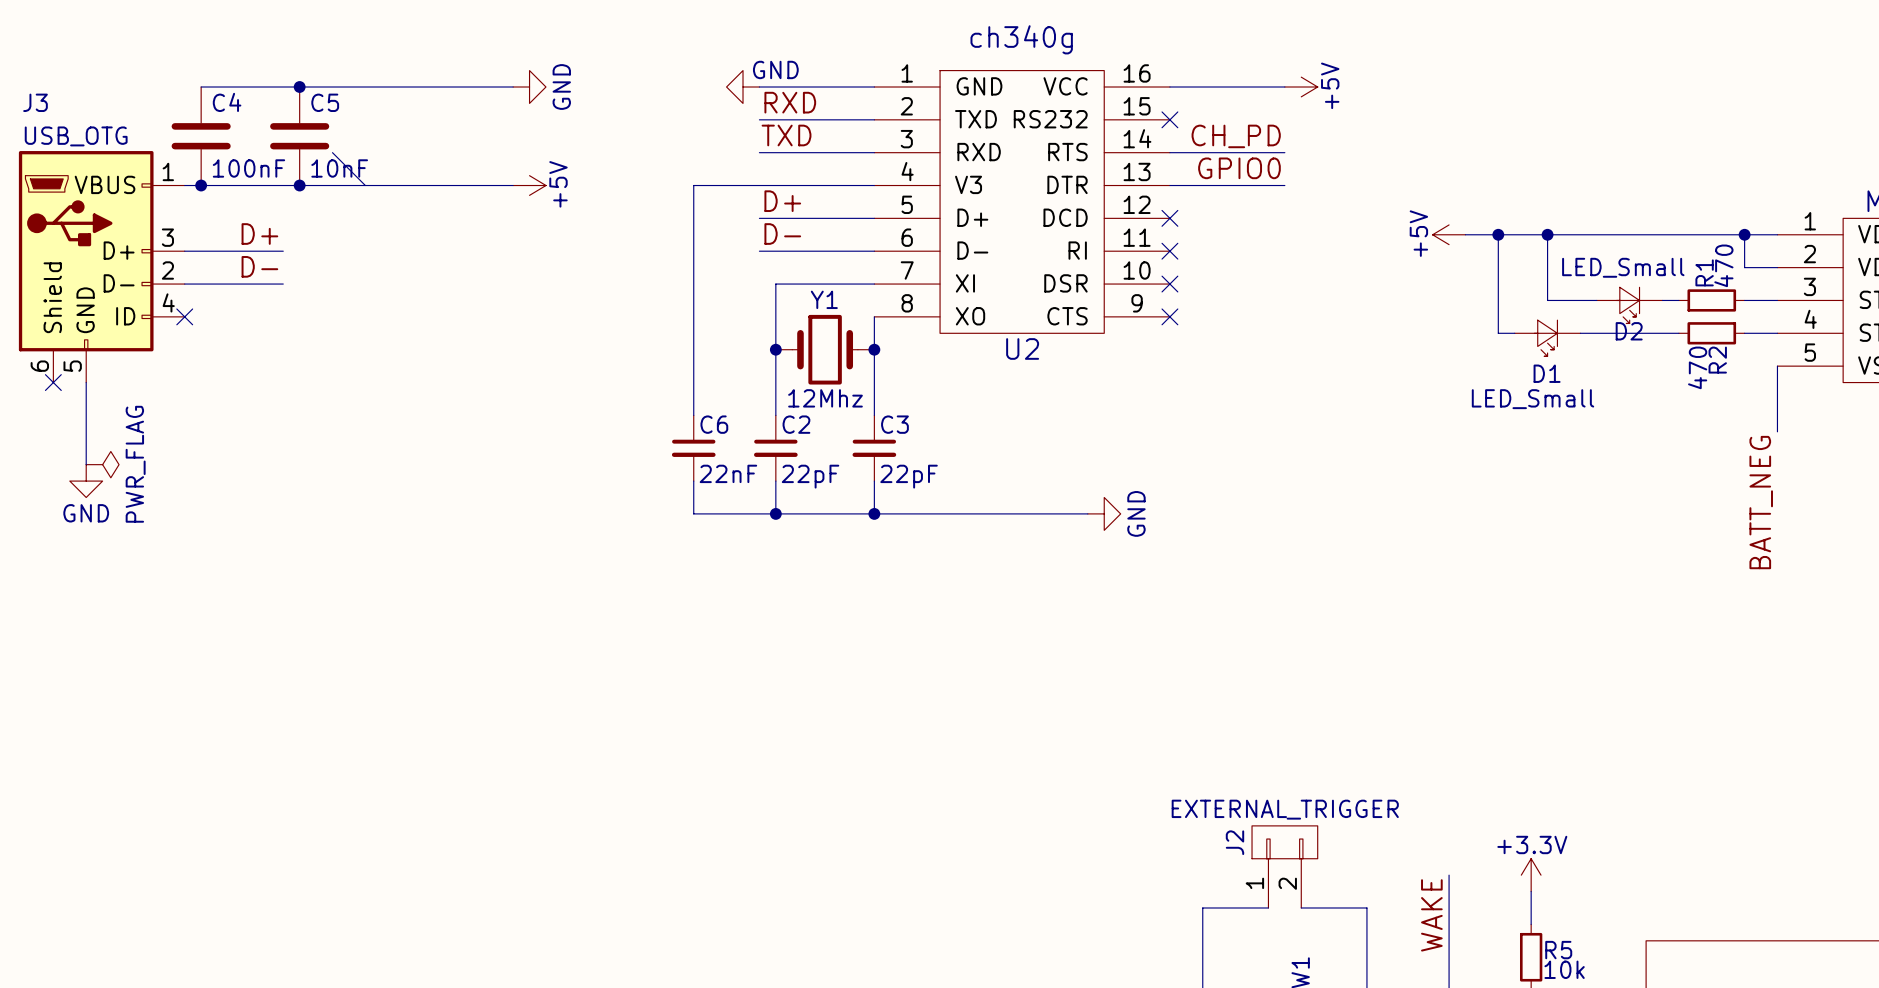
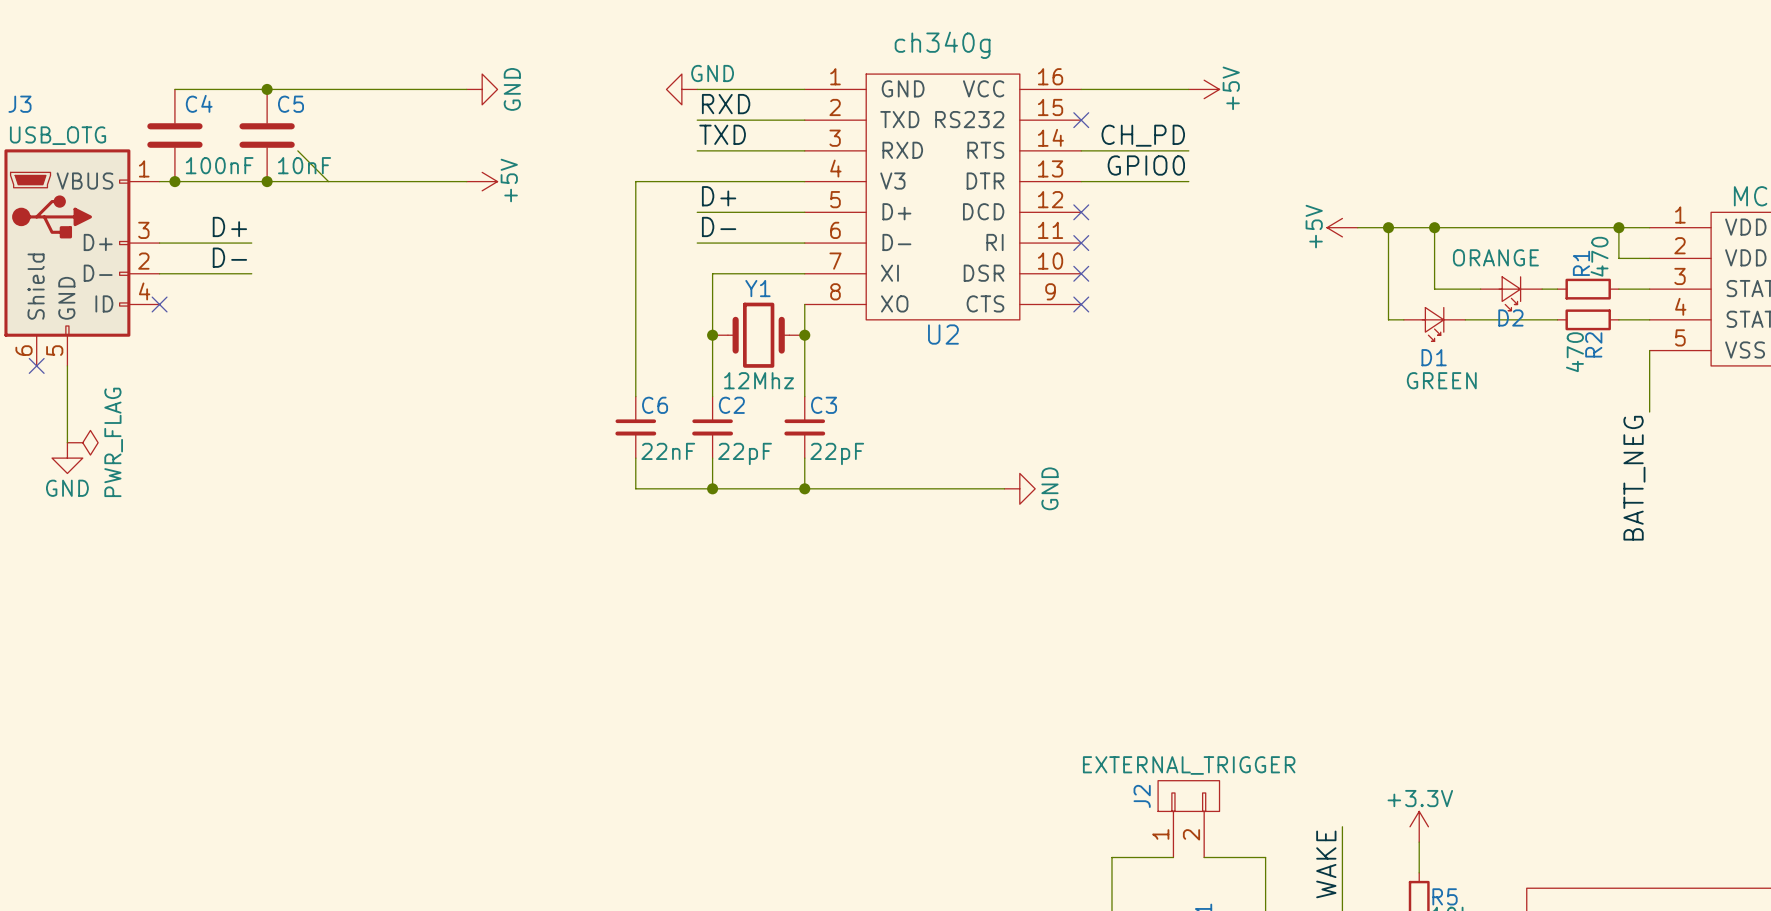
D2 value: LED_Small (1623, 267) -> ORANGE (1495, 257)
D1 value: LED_Small (1532, 399) -> GREEN (1441, 380)

